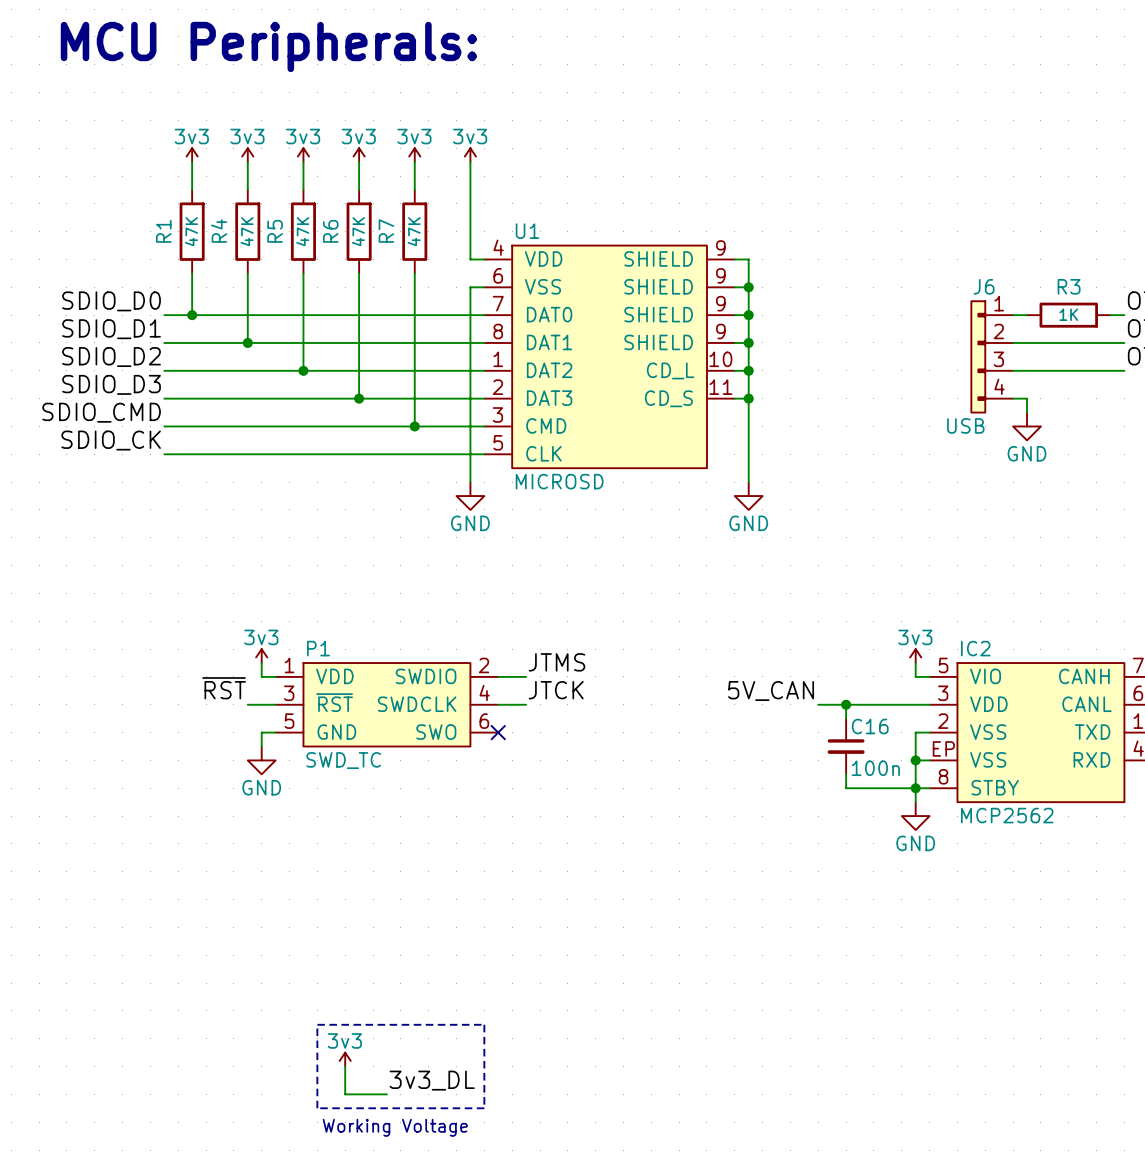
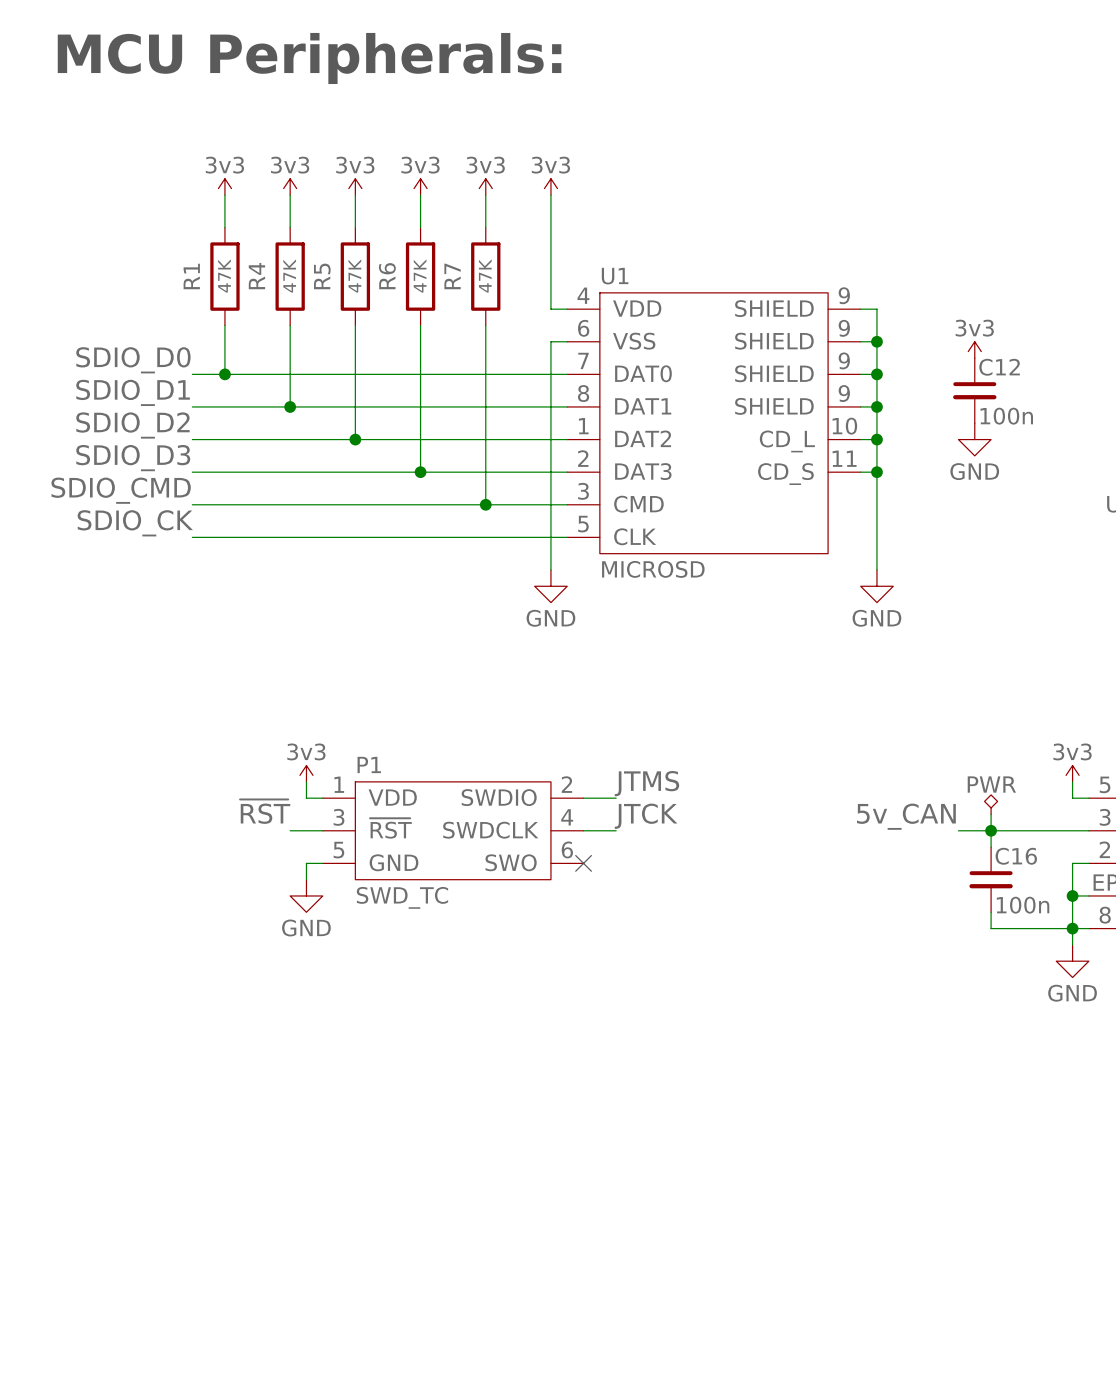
power symbol: none -> 3v3 (974, 349)
C12: none -> 100n (974, 390)
power symbol: none -> GND (974, 439)
power symbol: none -> PWR (991, 804)
label: 5V_CAN (771, 690) -> 5v_CAN (906, 816)
wire: none -> (991, 814) (991, 830)
line: (317, 1024) (317, 1108) (484, 1108) (484, 1024) (317, 1024) -> none
power symbol: 3v3 (345, 1059) -> none
wire: (345, 1066) (345, 1094) (386, 1094) -> none
label: 3v3_DL (432, 1080) -> none
text: Working Voltage (395, 1127) -> none

